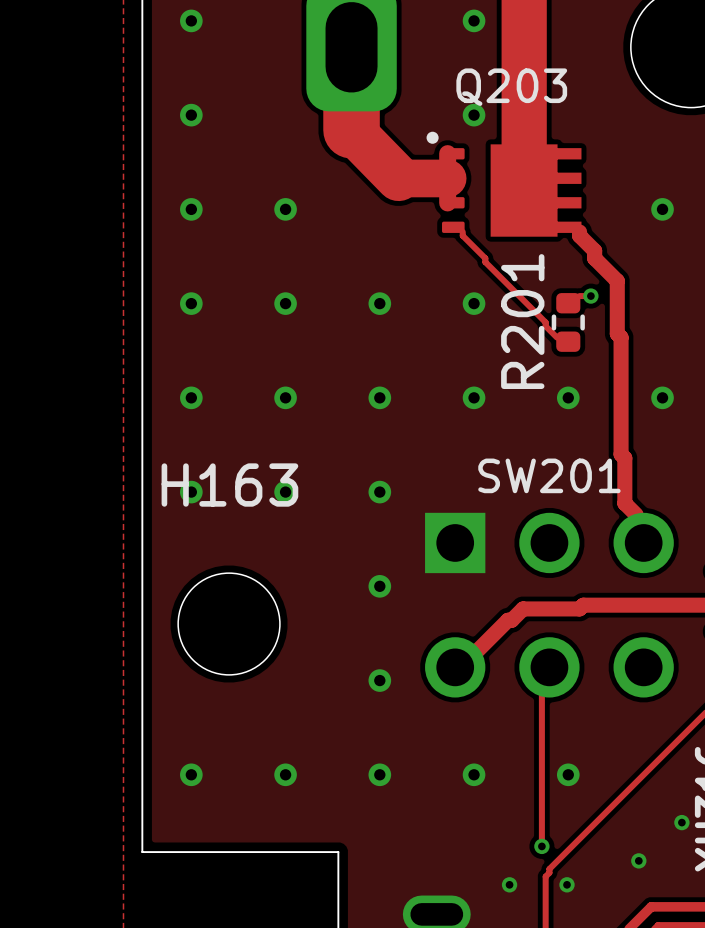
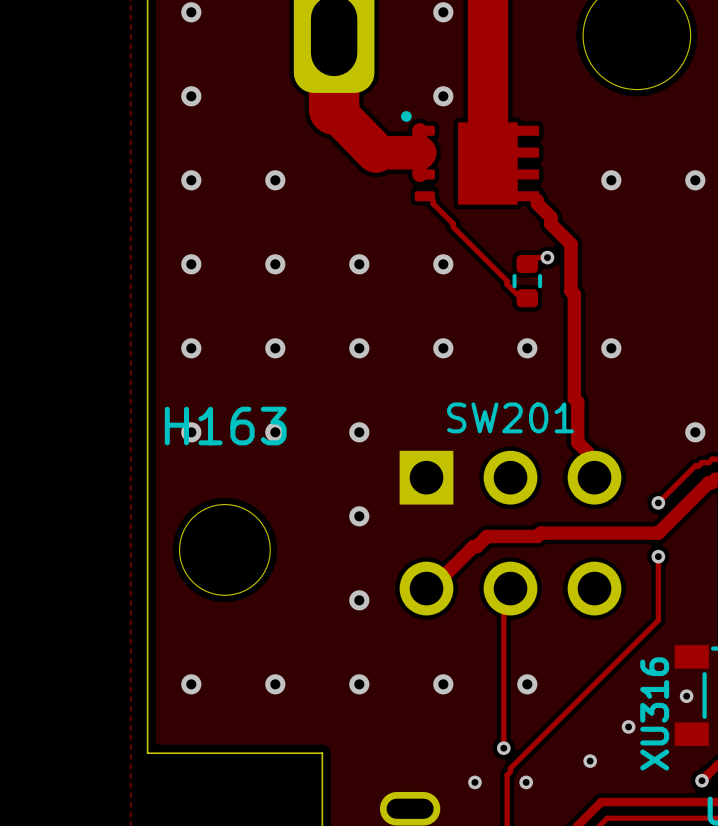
Q203 name: Q203 (511, 87) -> none
R201 name: R201 (522, 321) -> none

